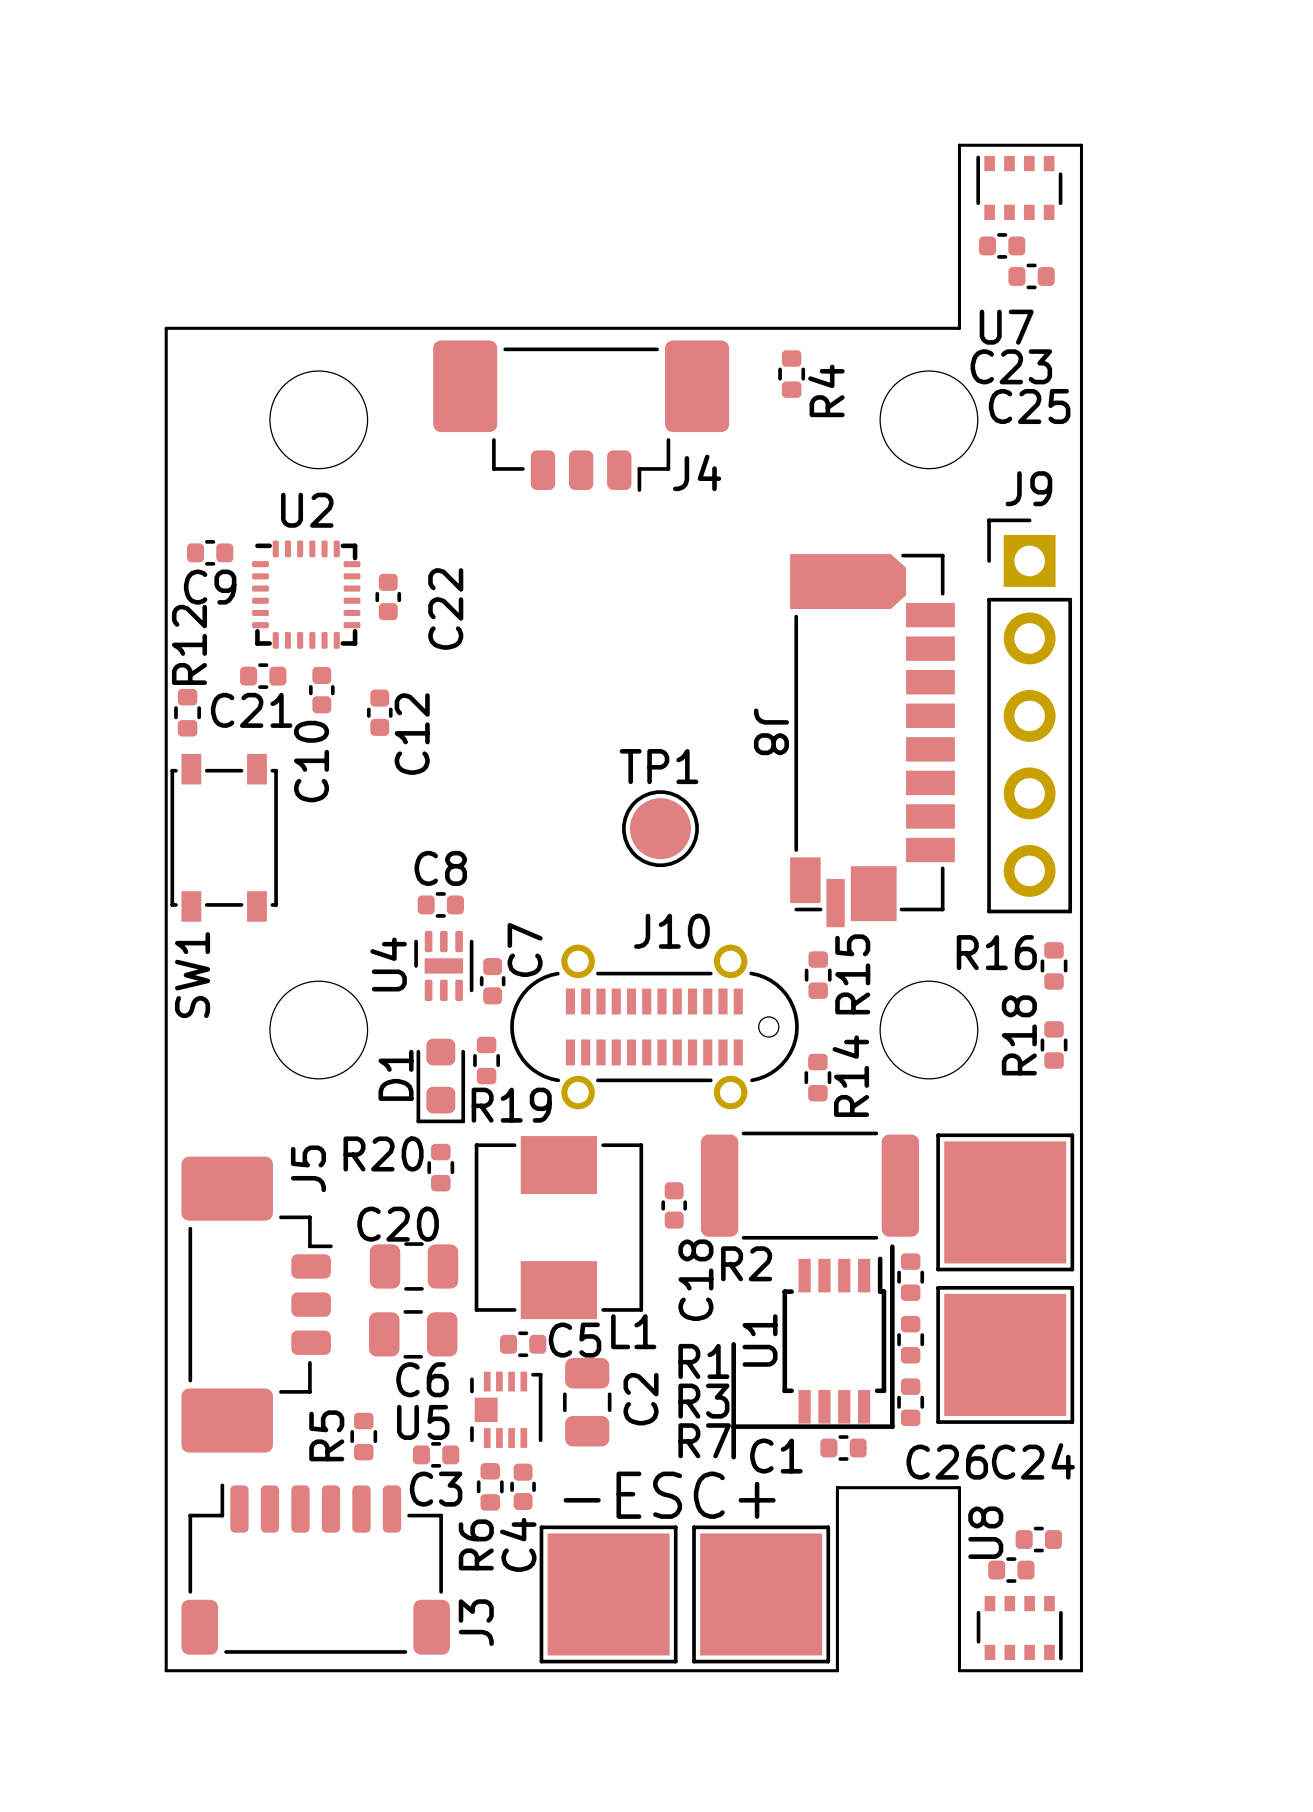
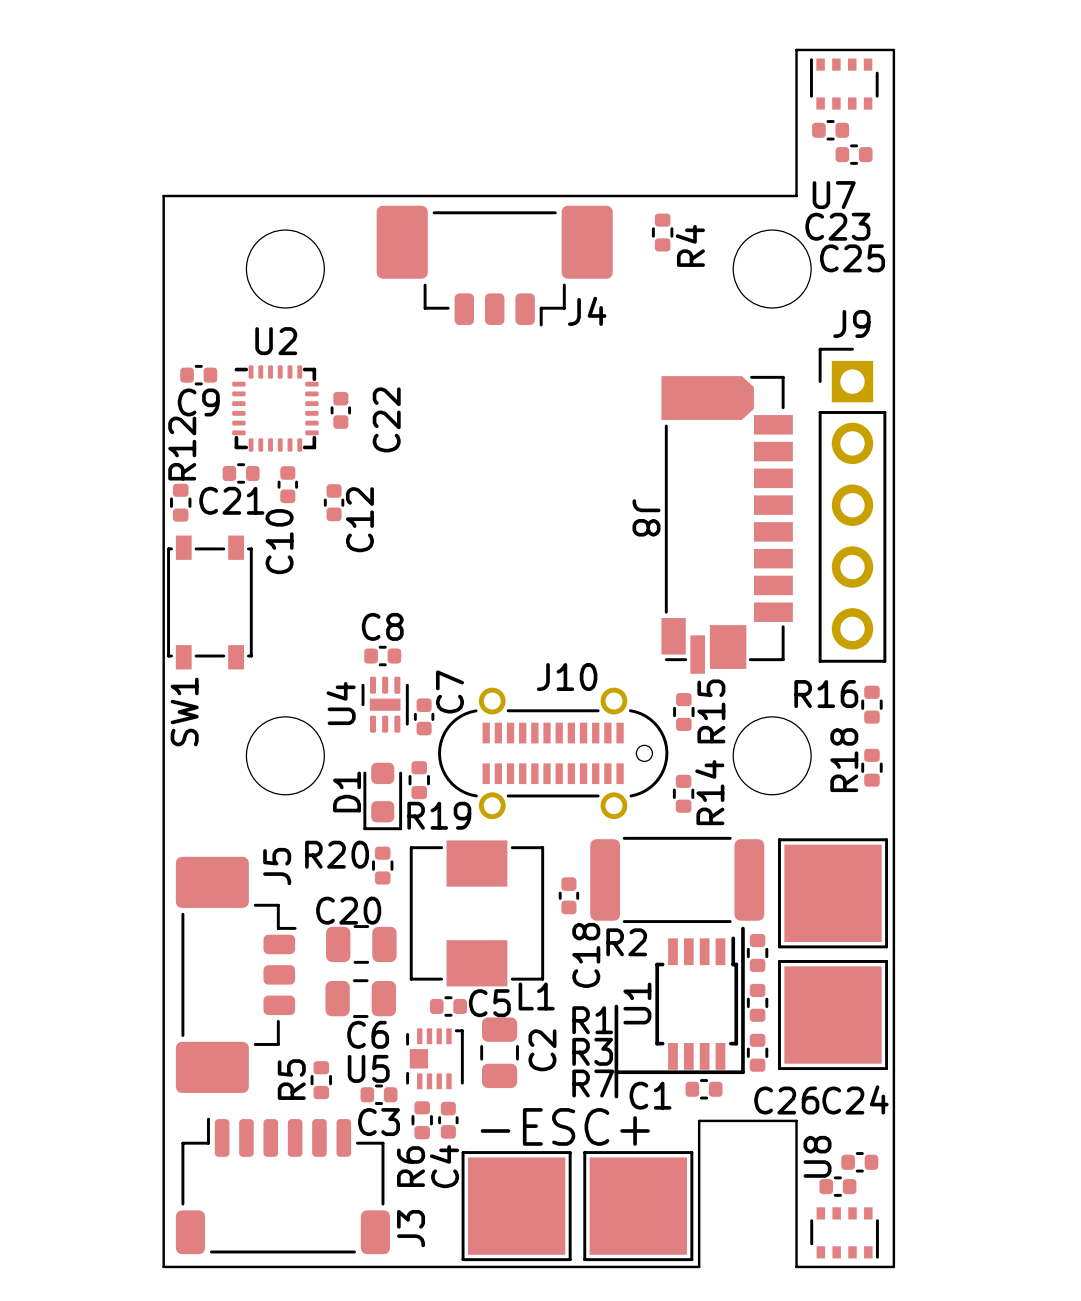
TP1: (660, 828) -> none

